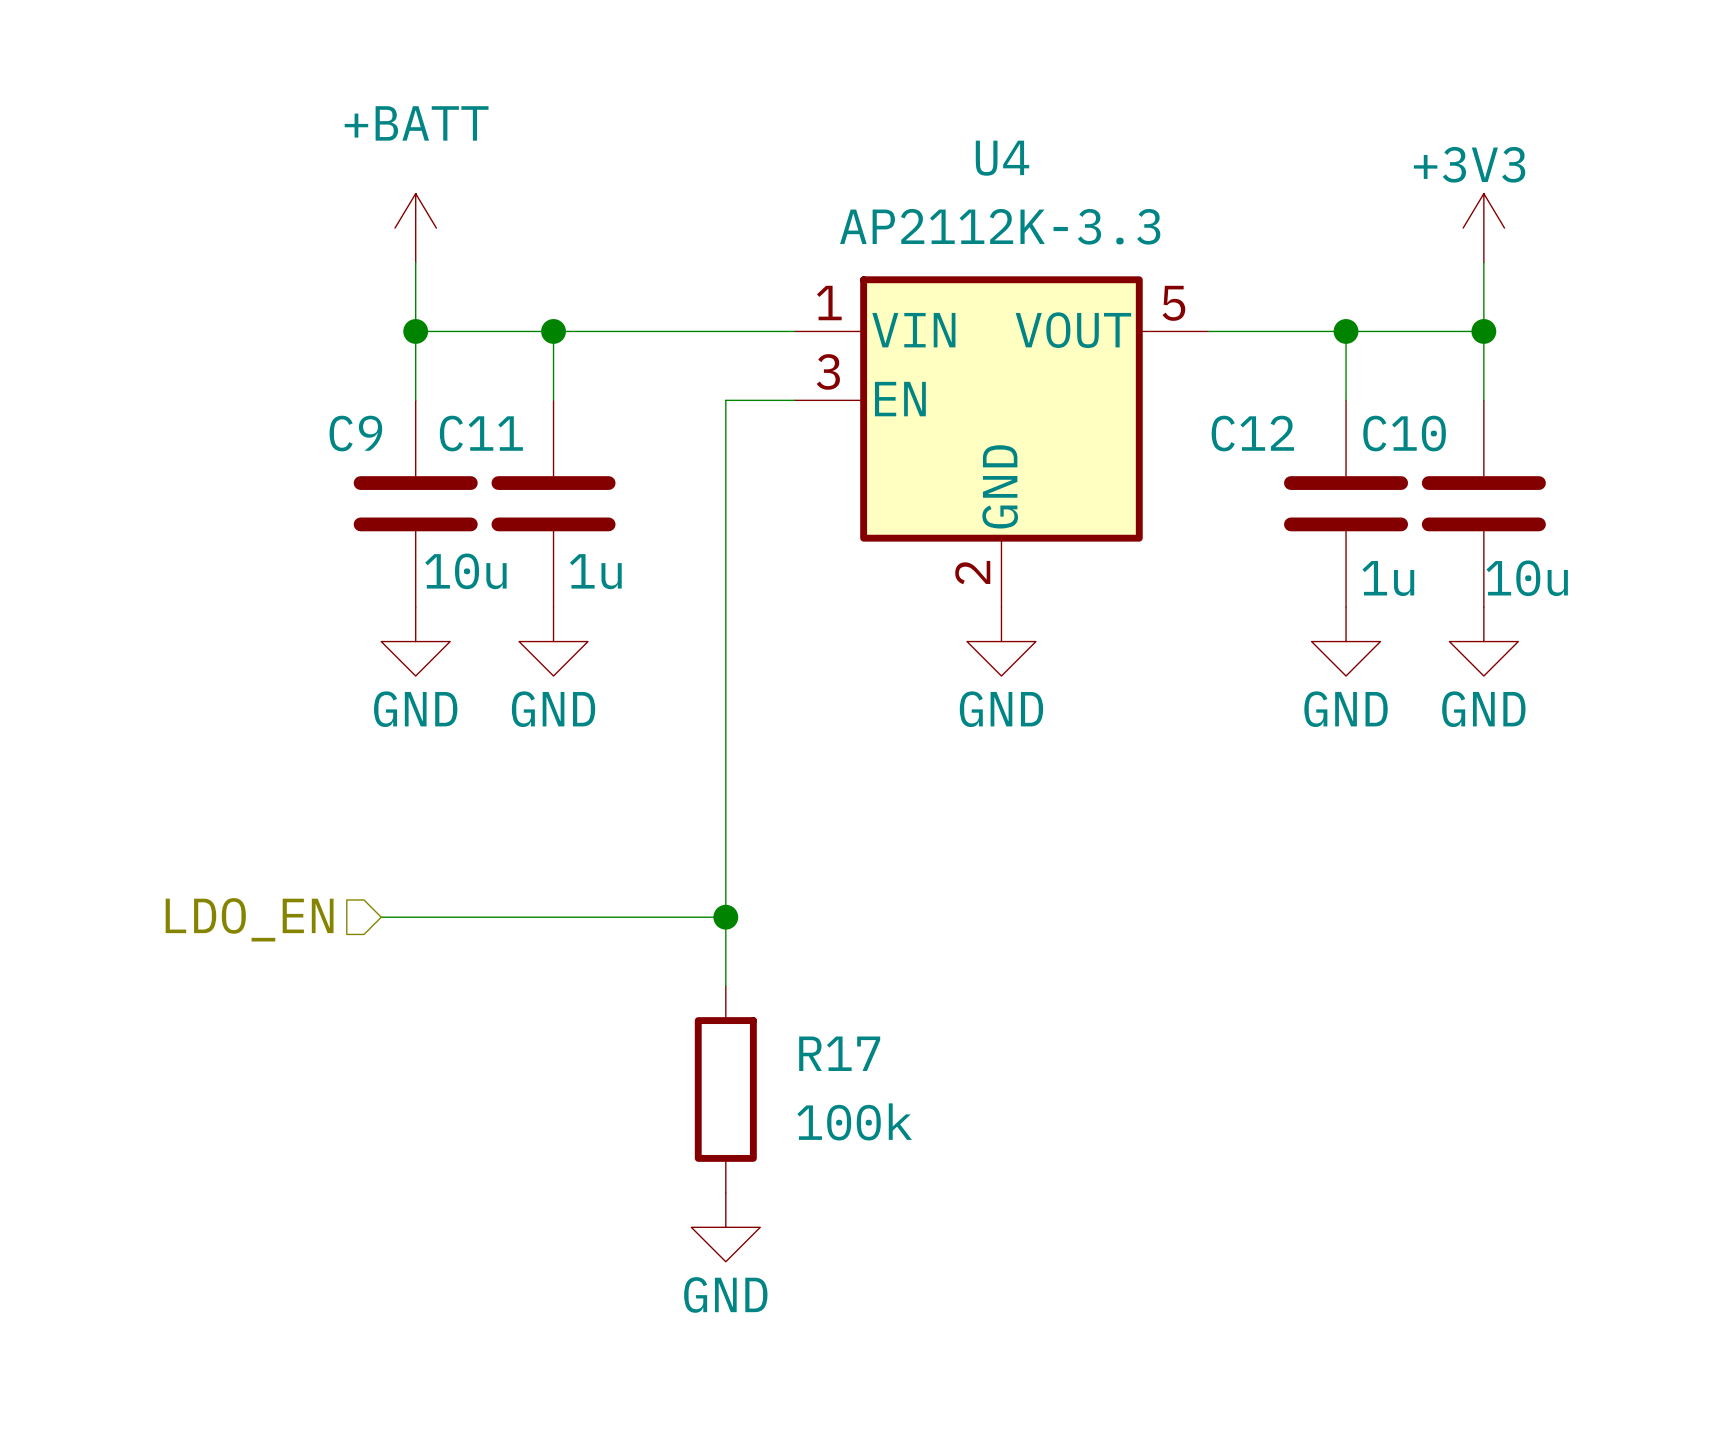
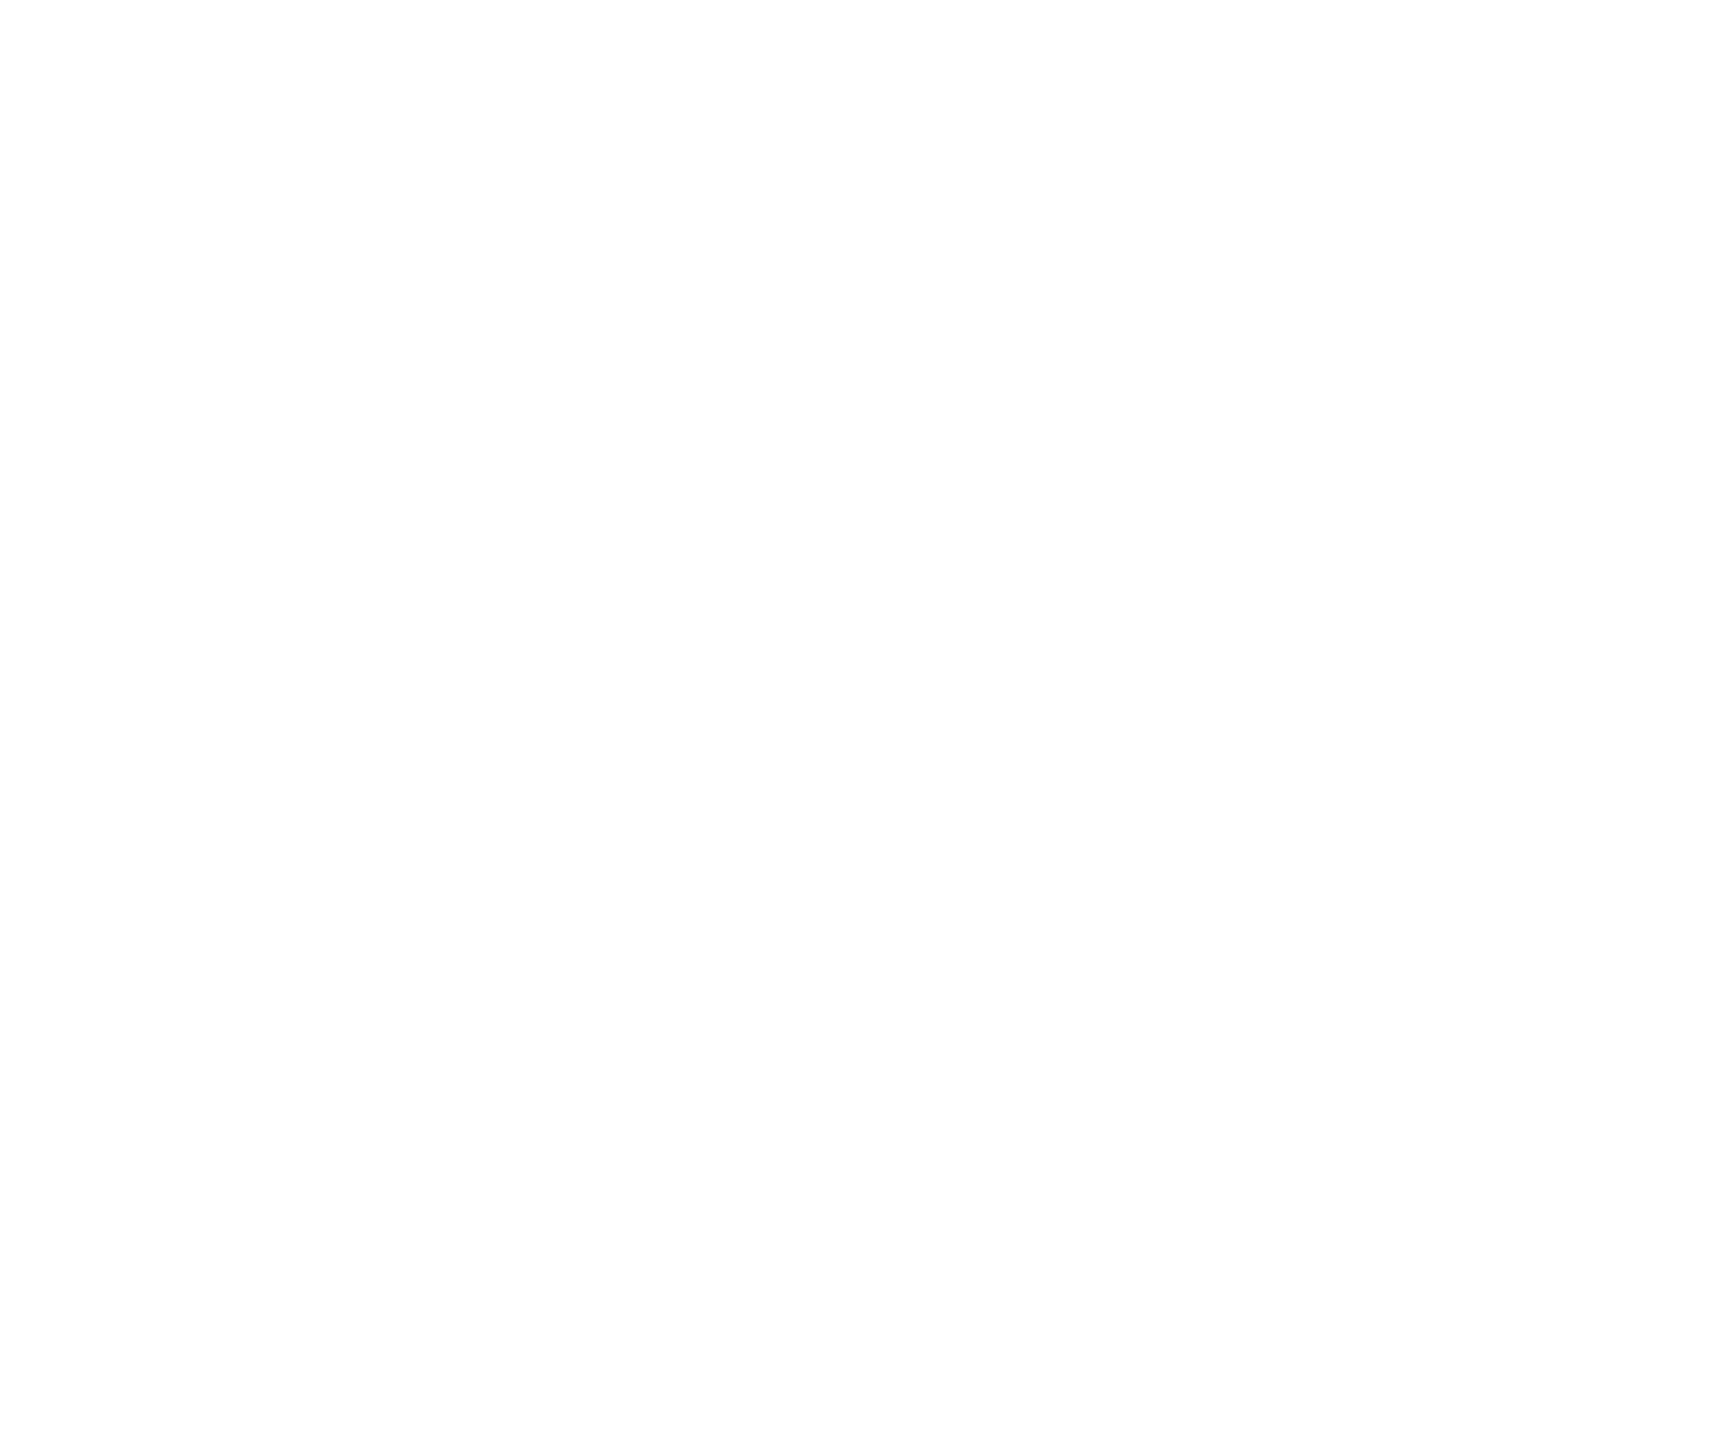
power symbol: +BATT (415, 228) -> none
power symbol: +3V3 (1483, 228) -> none
wire: (415, 262) (415, 400) -> none
wire: (1483, 262) (1483, 400) -> none
wire: (415, 331) (794, 331) -> none
junction: (415, 331) -> none
wire: (553, 331) (553, 400) -> none
junction: (553, 331) -> none
wire: (1208, 331) (1483, 331) -> none
wire: (1346, 331) (1346, 400) -> none
junction: (1346, 331) -> none
junction: (1483, 331) -> none
wire: (794, 400) (725, 400) (725, 986) -> none
U4: AP2112K-3.3 (1001, 441) -> none
C9: 10u (415, 503) -> none
C11: 1u (553, 503) -> none
C12: 1u (1346, 503) -> none
C10: 10u (1483, 503) -> none
power symbol: GND (415, 641) -> none
power symbol: GND (553, 641) -> none
power symbol: GND (1001, 641) -> none
power symbol: GND (1346, 641) -> none
power symbol: GND (1483, 641) -> none
wire: (381, 917) (725, 917) -> none
junction: (725, 917) -> none
hierarchical label: LDO_EN (249, 919) -> none
R17: 100k (725, 1089) -> none
power symbol: GND (725, 1227) -> none

